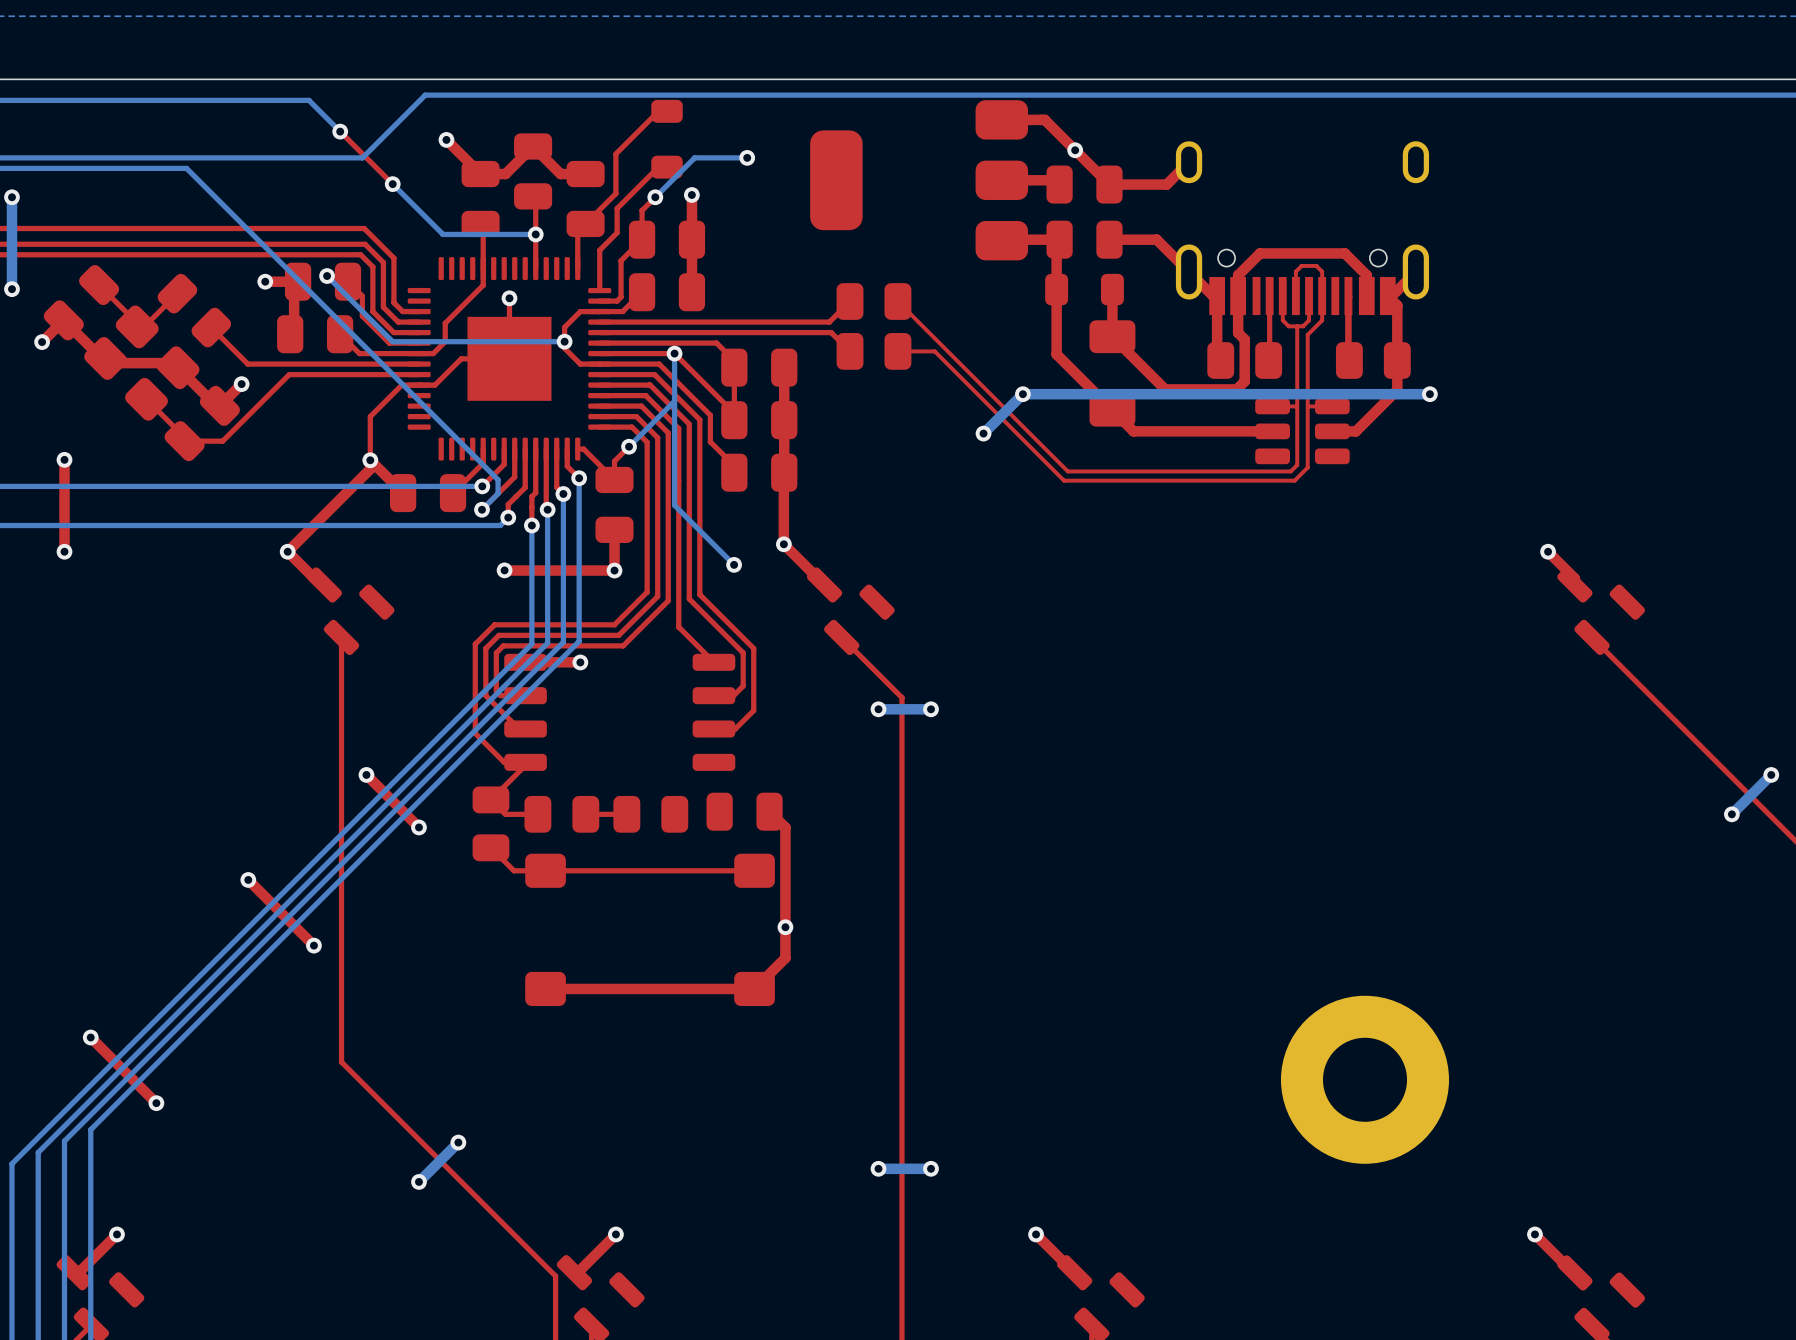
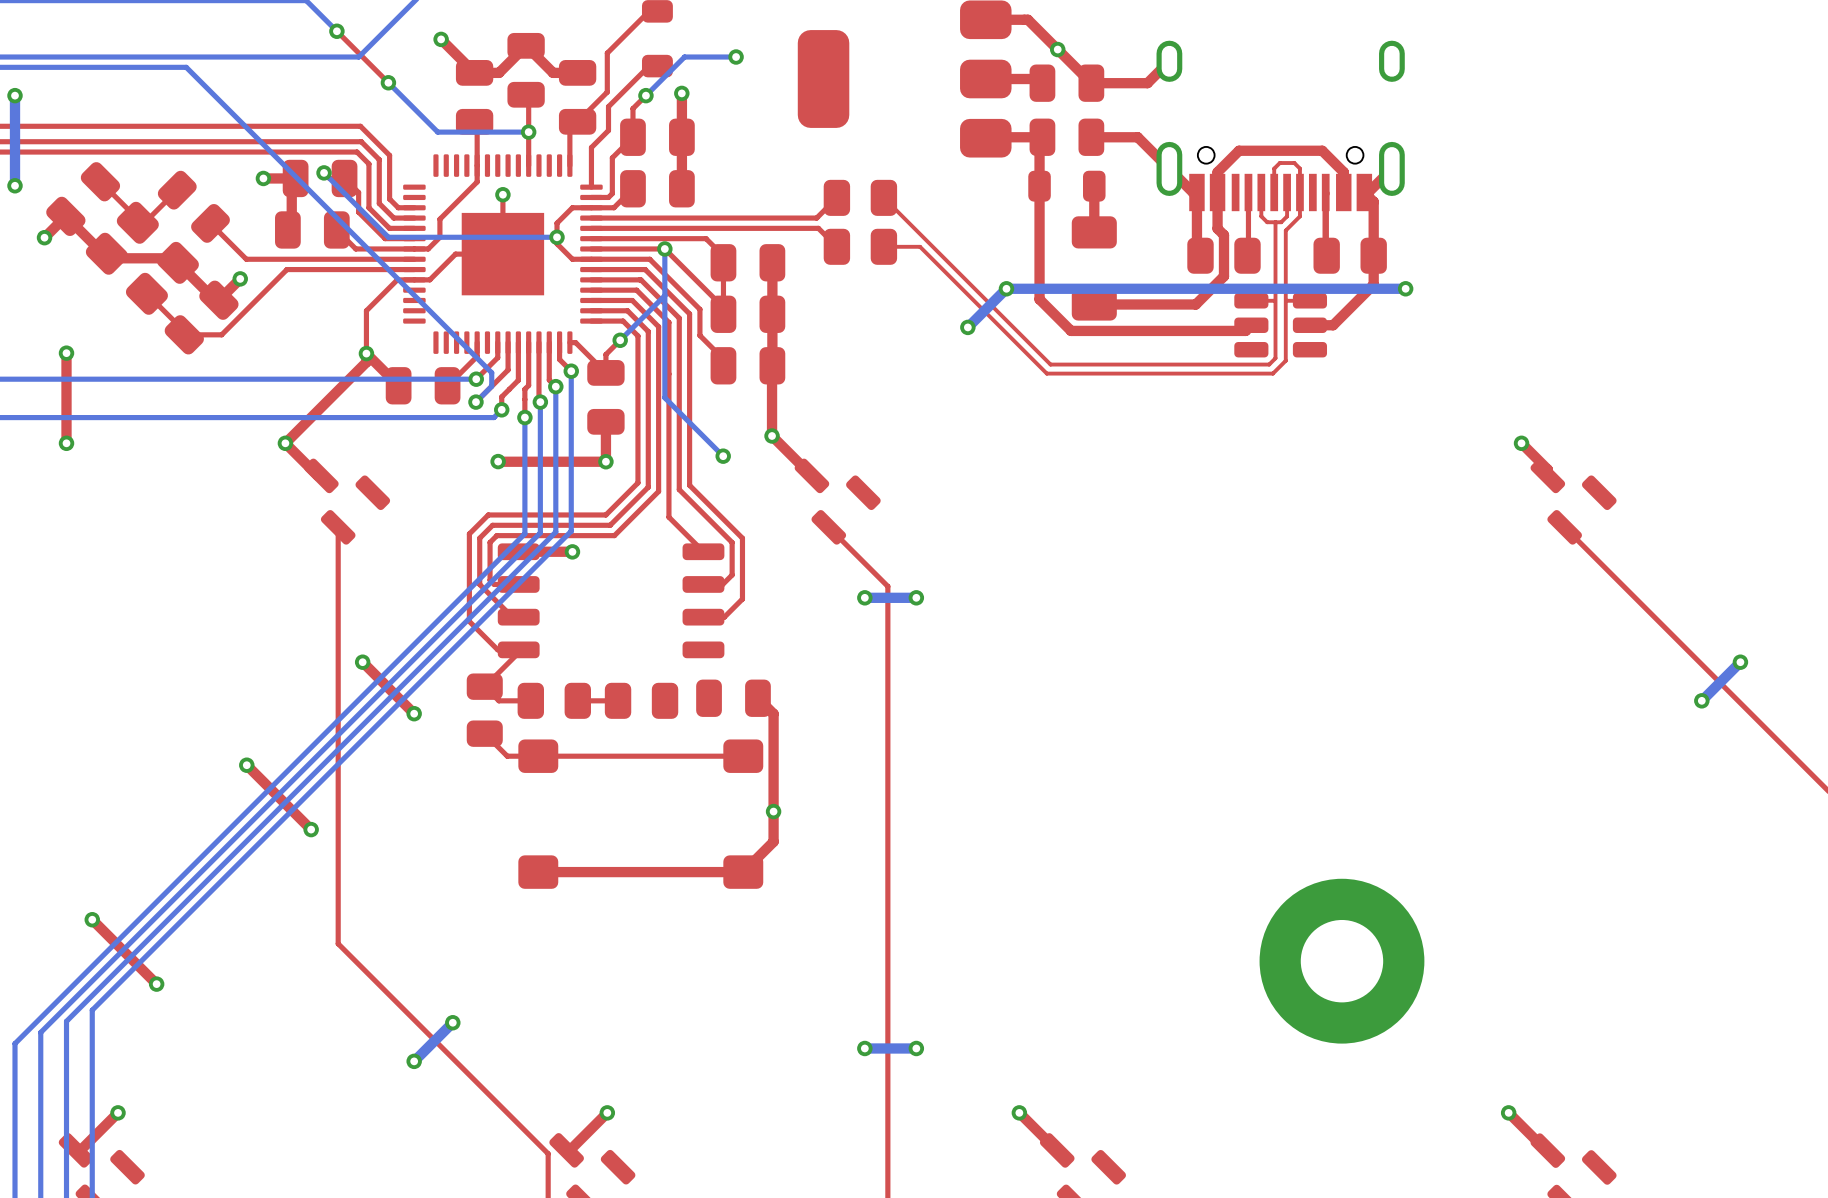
top track: (1112, 336) (1165, 389) (1236, 389) -> (1094, 304) (1195, 304) (1216, 284)
top track: (1056, 354) (1133, 431) (1272, 431) -> (1039, 249) (1039, 299) (1071, 330) (1245, 330) (1251, 325)

